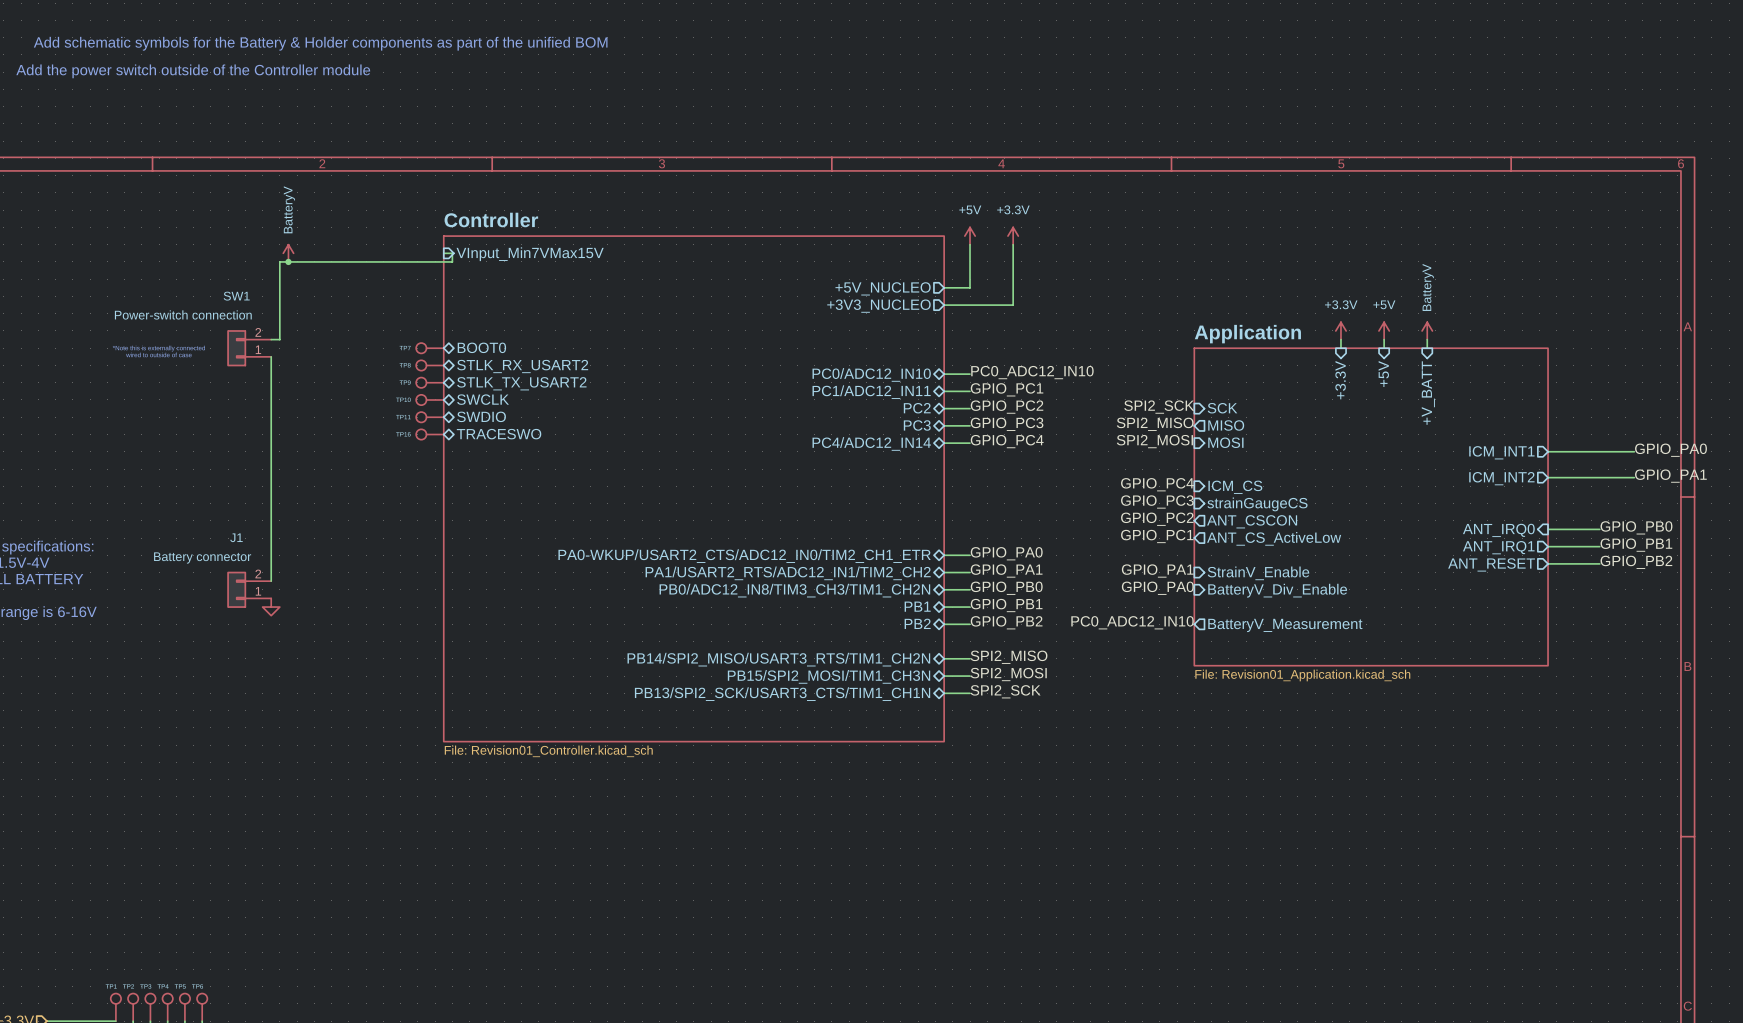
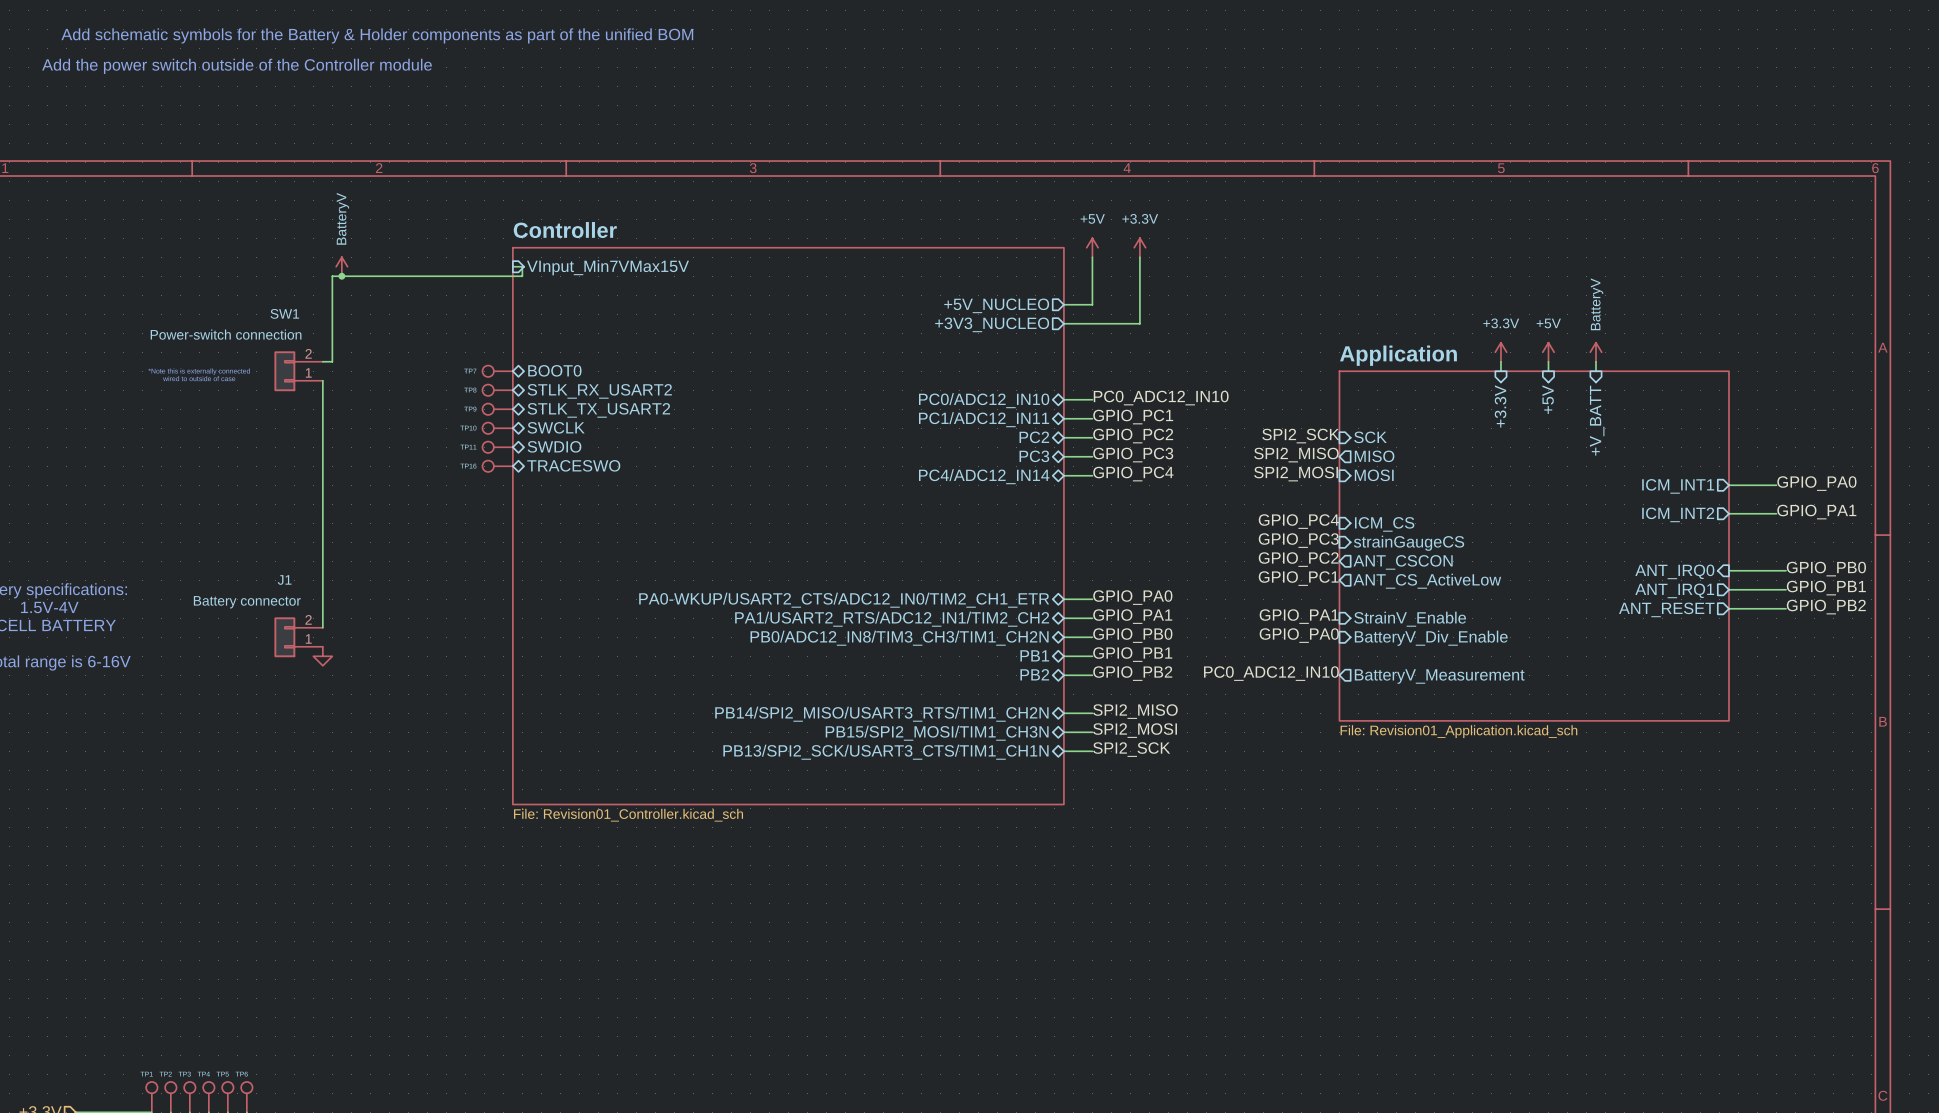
label position: GPIO_PA0 (1670, 450) -> GPIO_PA0 (1816, 483)
wire: (1591, 451) (1634, 451) -> none
label position: GPIO_PA1 (1670, 476) -> GPIO_PA1 (1816, 512)
wire: (1591, 477) (1634, 477) -> none

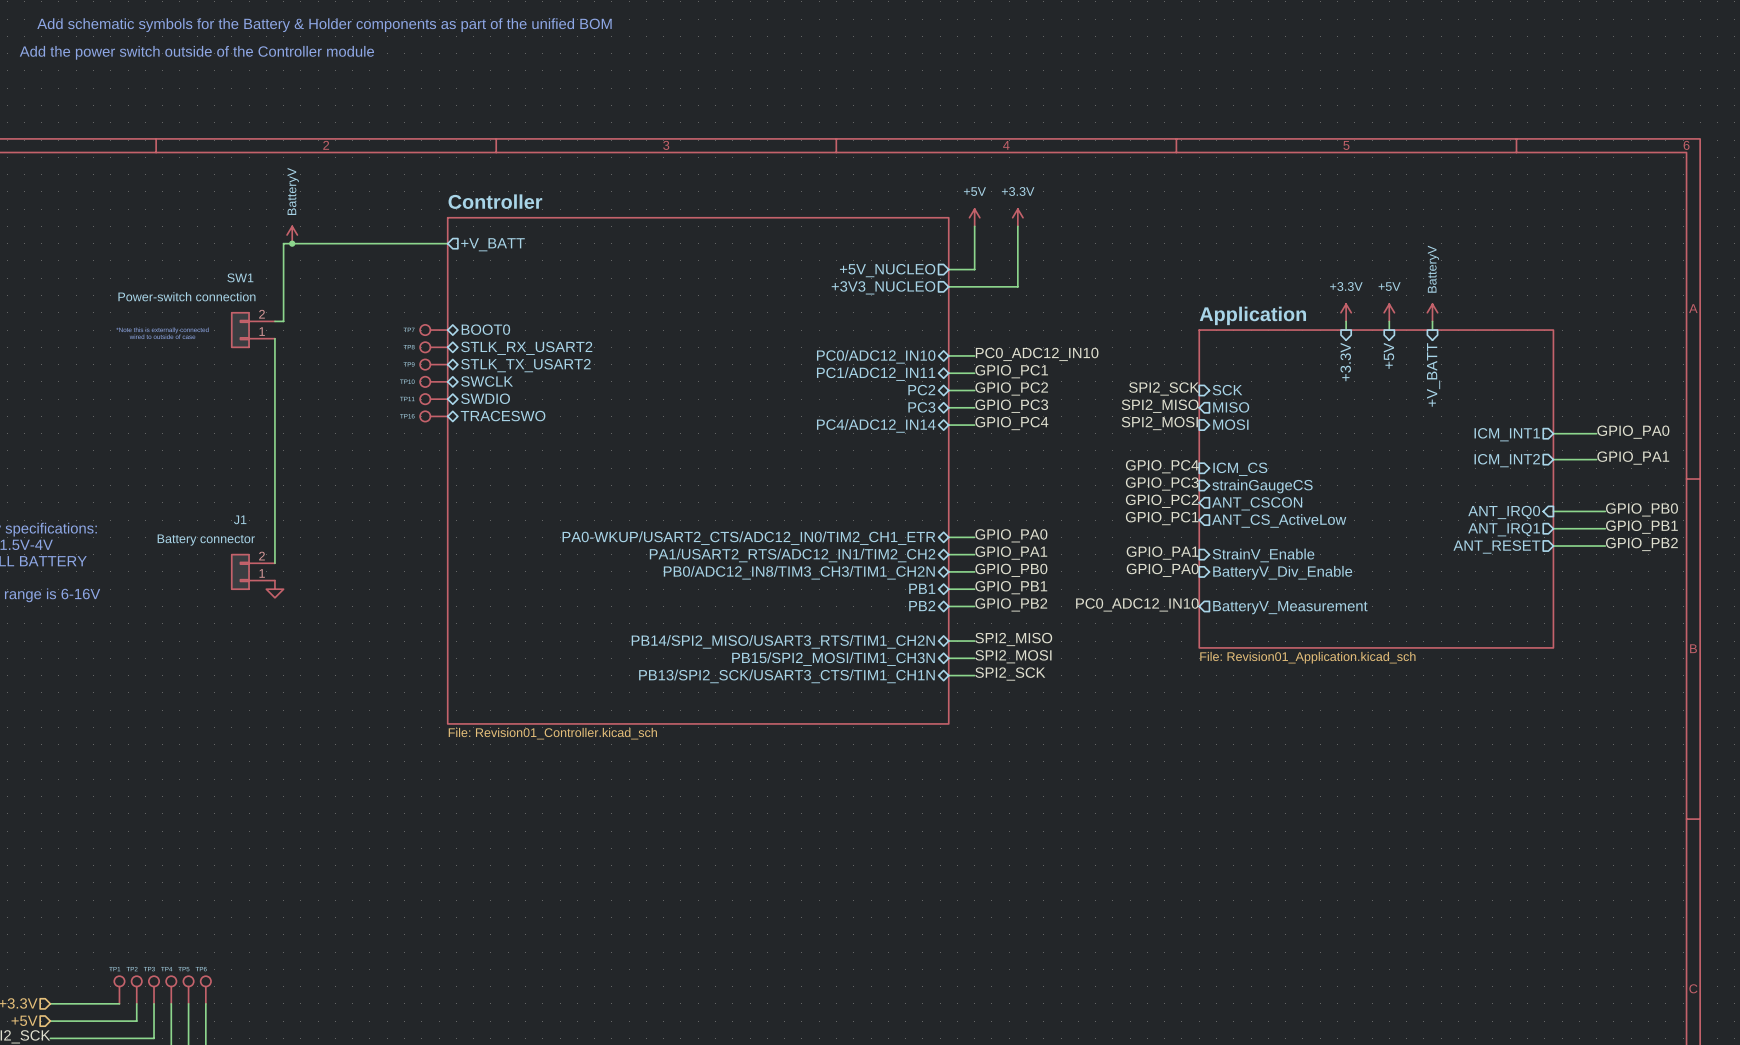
wire: (512, 266) (522, 266) (522, 276) (512, 276) -> none
sheet pin: VInput_Min7VMax15V (607, 267) -> none
sheet pin: none -> +V_BATT (492, 244)

